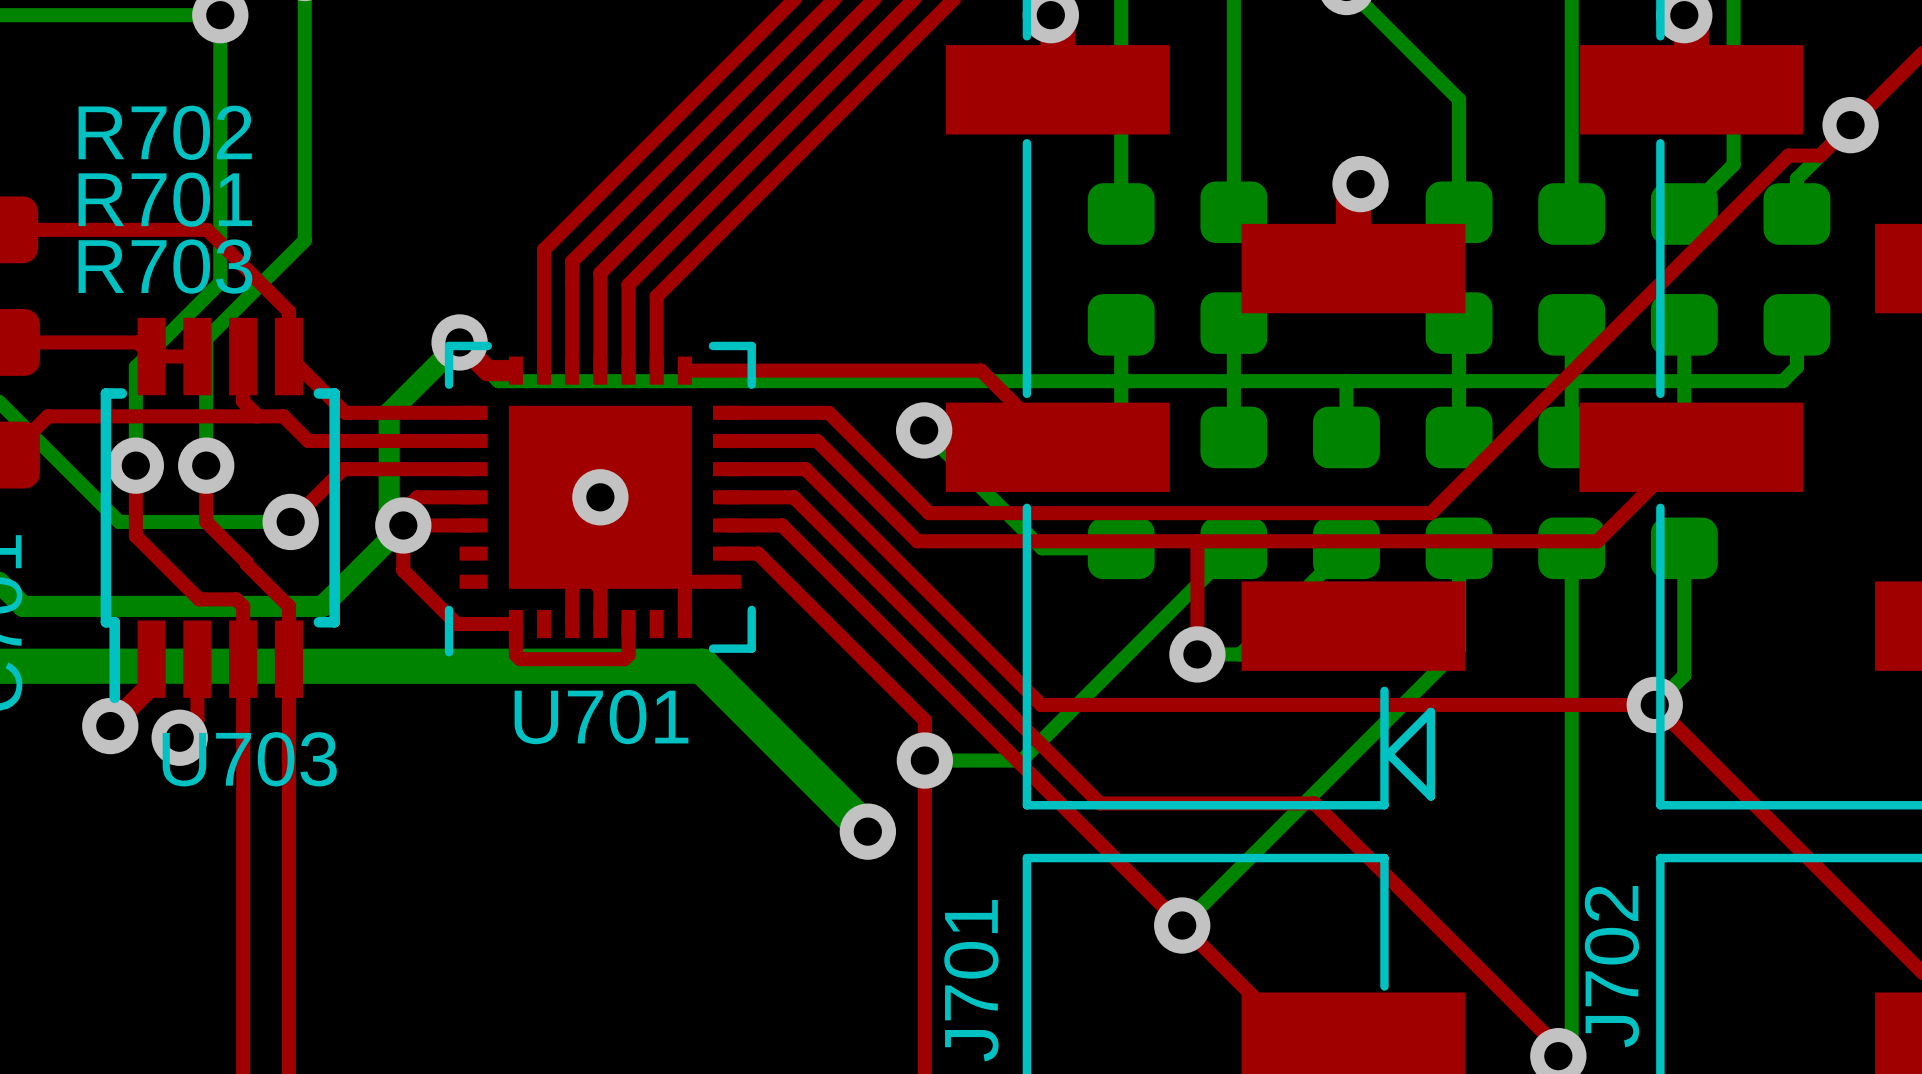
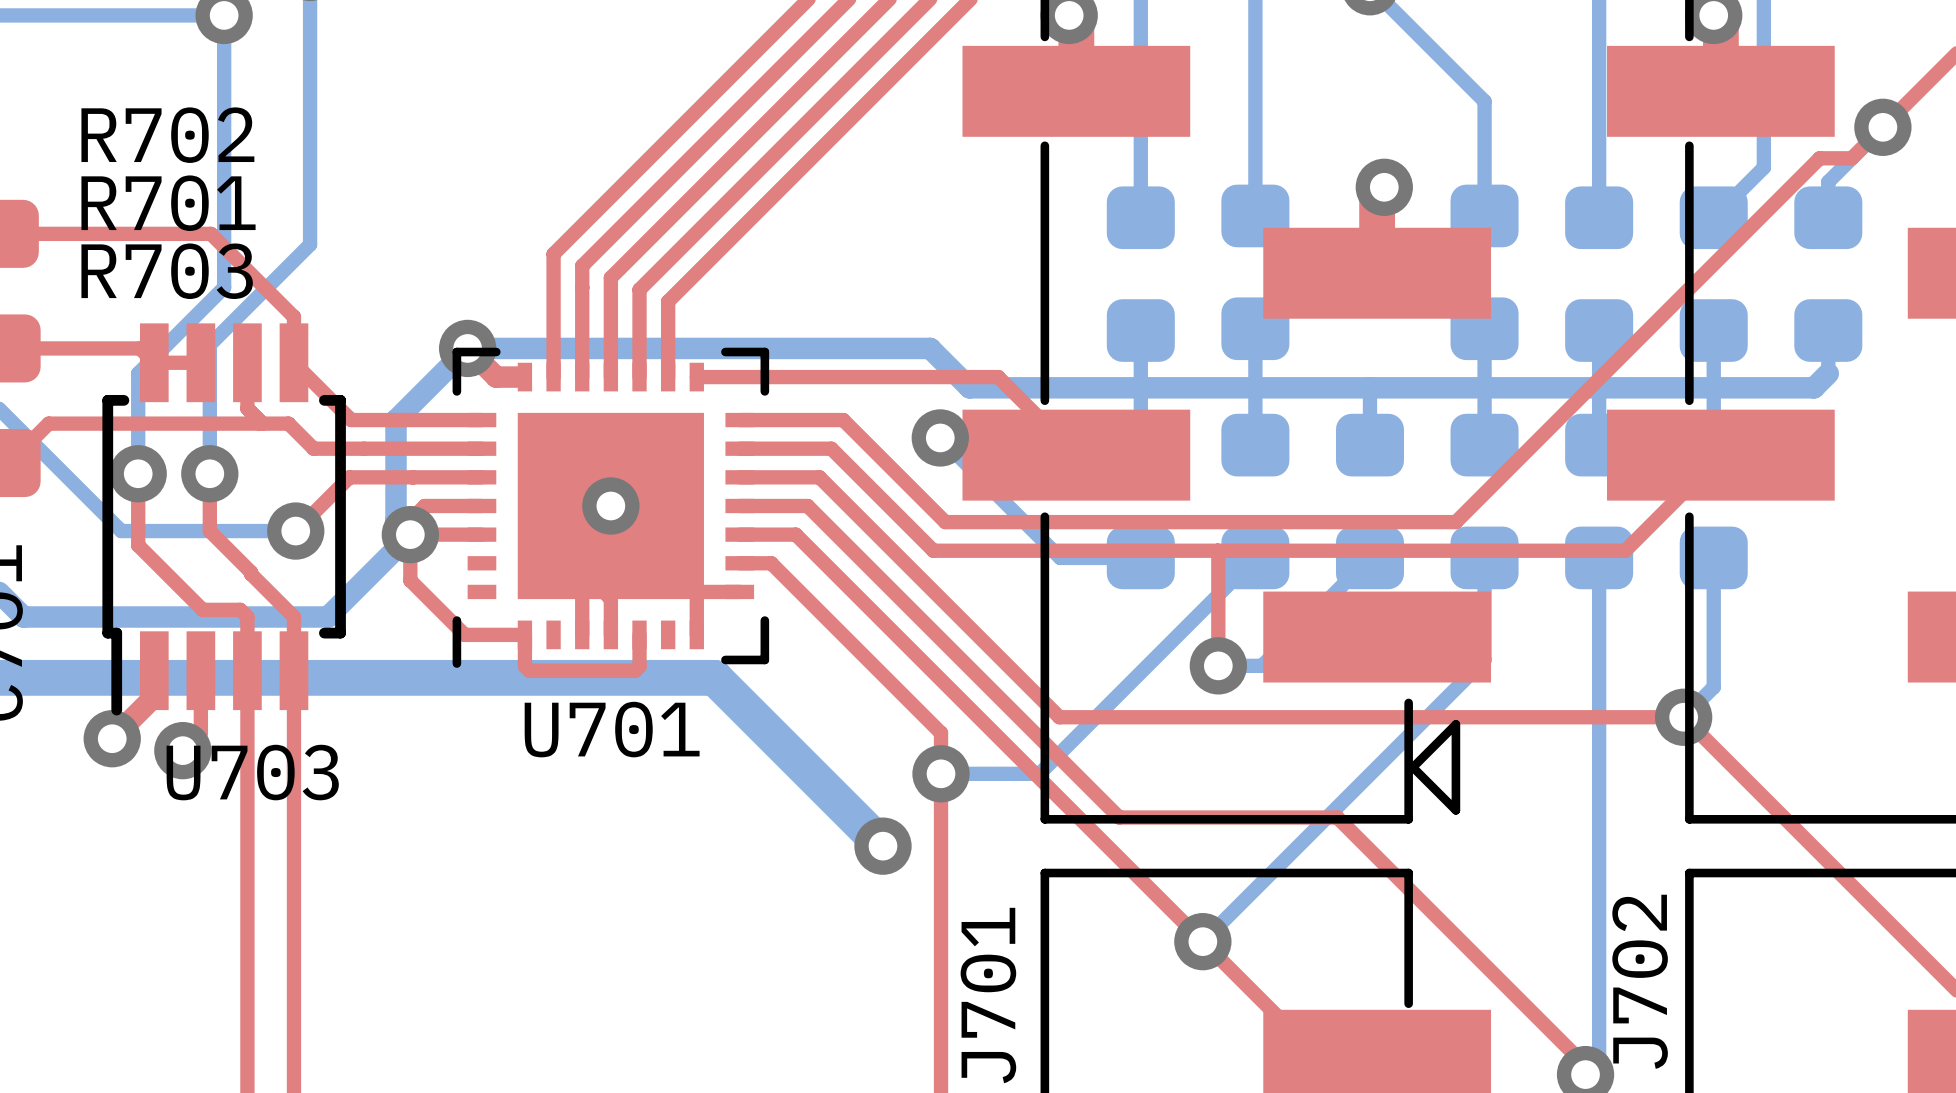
bottom track: (459, 342) (498, 381) (953, 381) -> (467, 348) (930, 348) (969, 387)
bottom track width: thin (1796, 367) (1782, 381) (953, 381) -> thick (1828, 373) (1813, 387) (969, 387)

